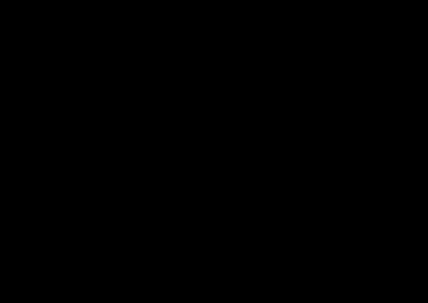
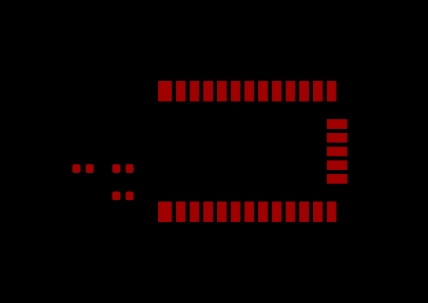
part: none -> (252, 151)
part: none -> (83, 168)
part: none -> (122, 168)
part: none -> (122, 195)

